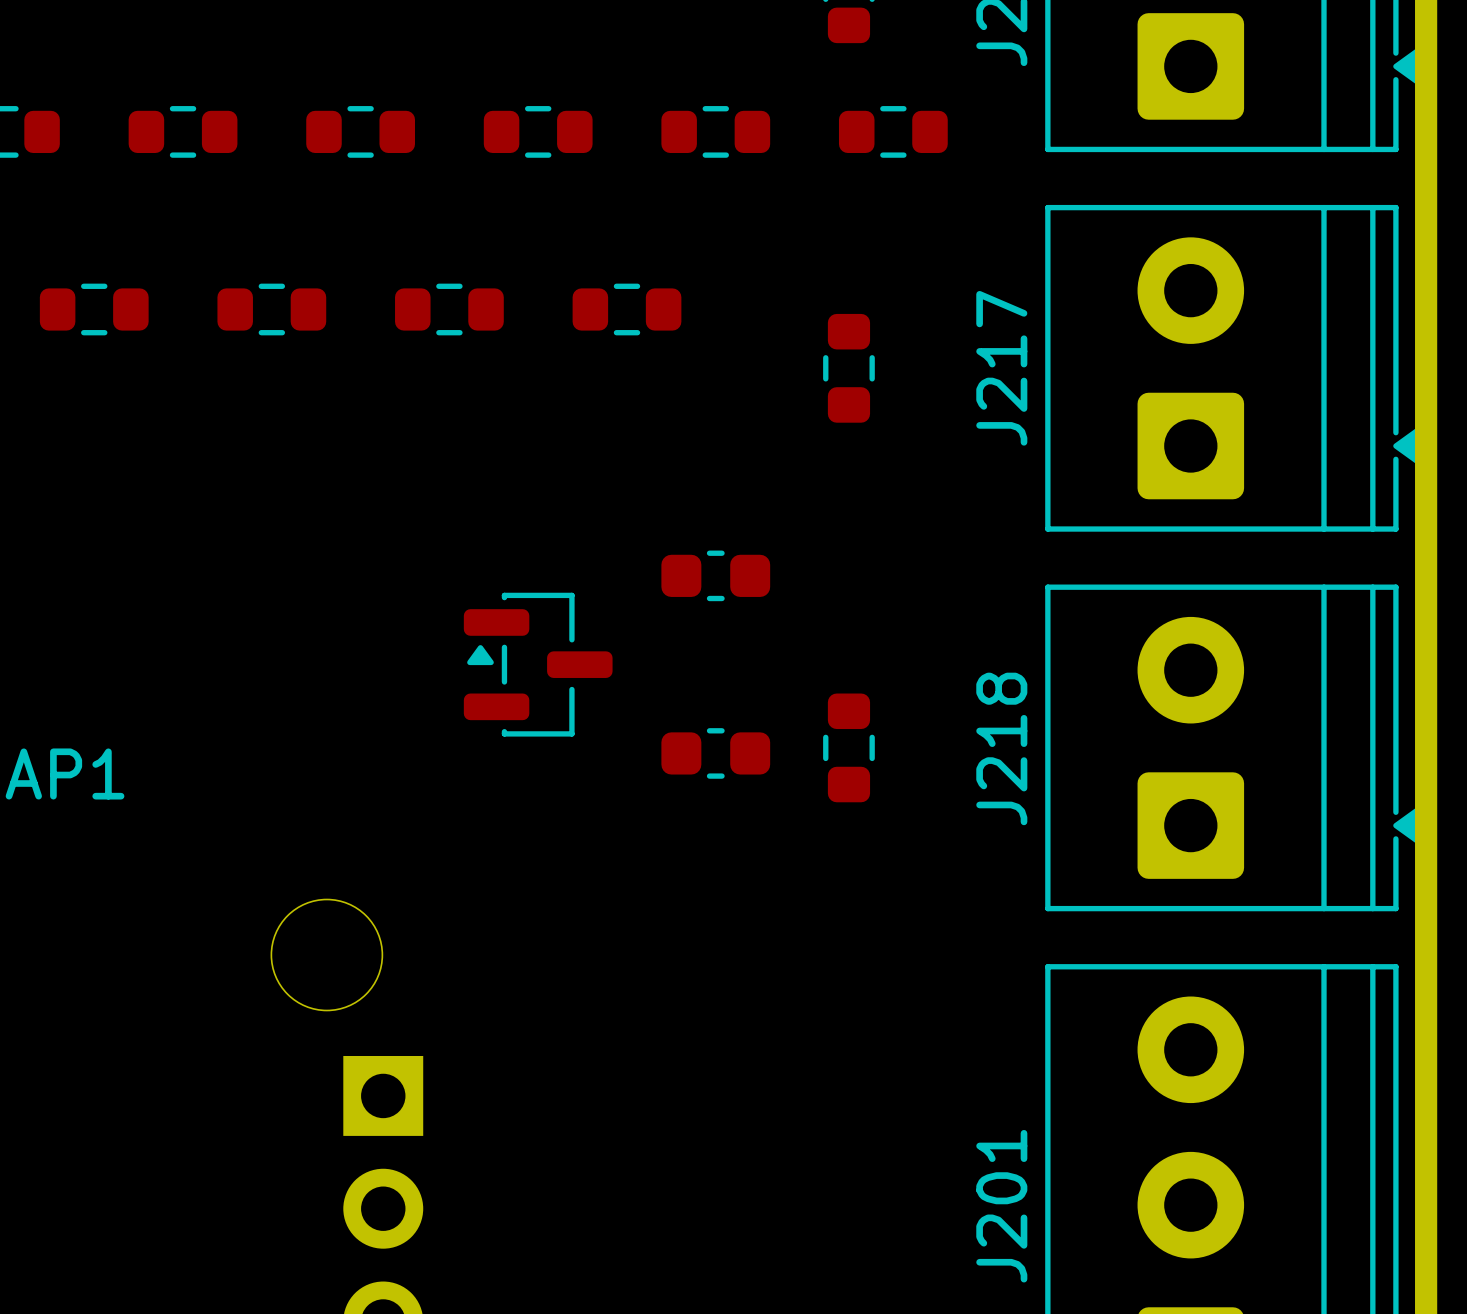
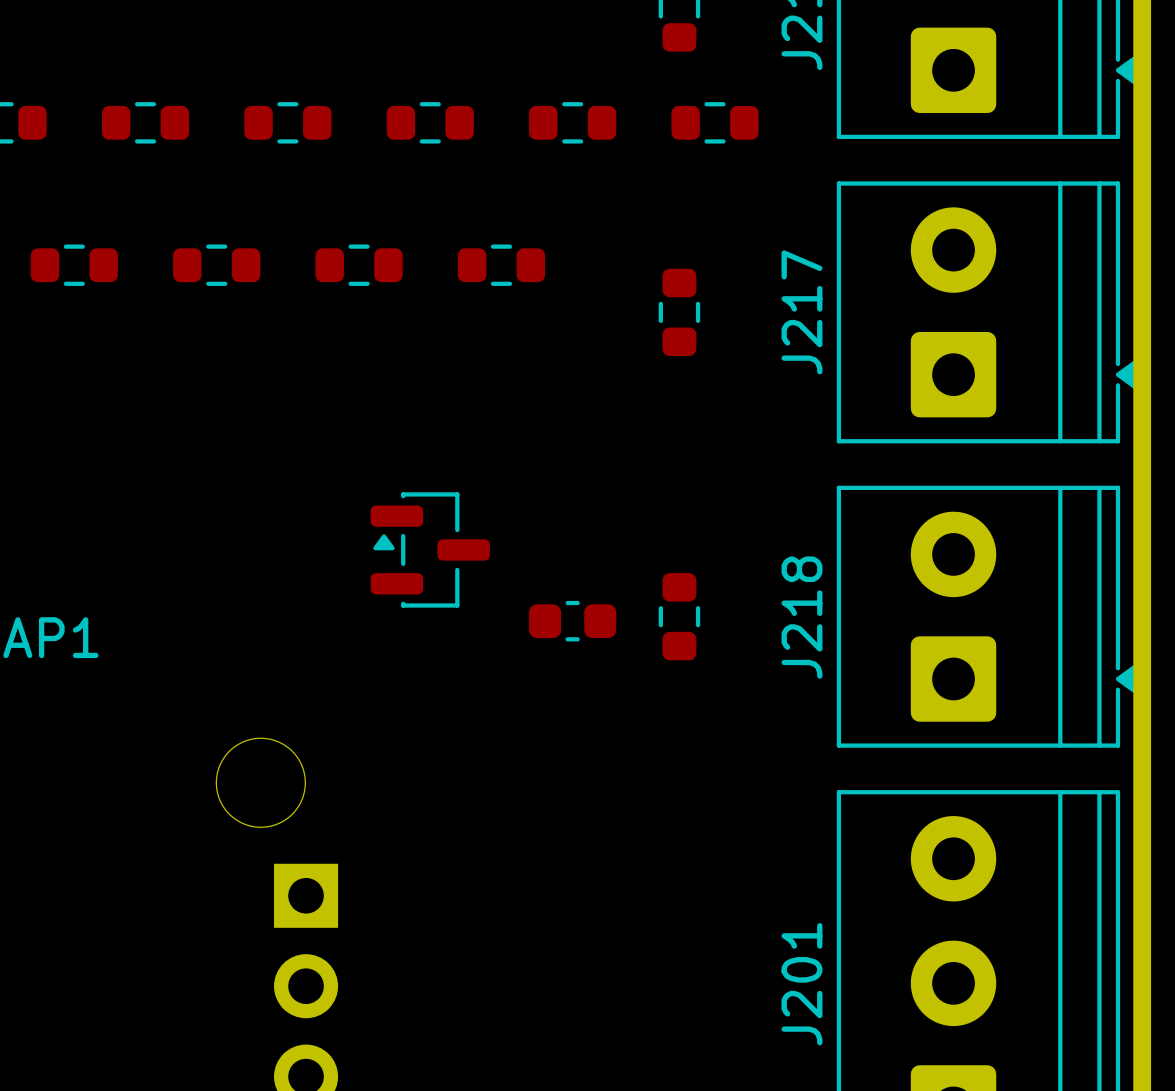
part: (715, 575) -> none

